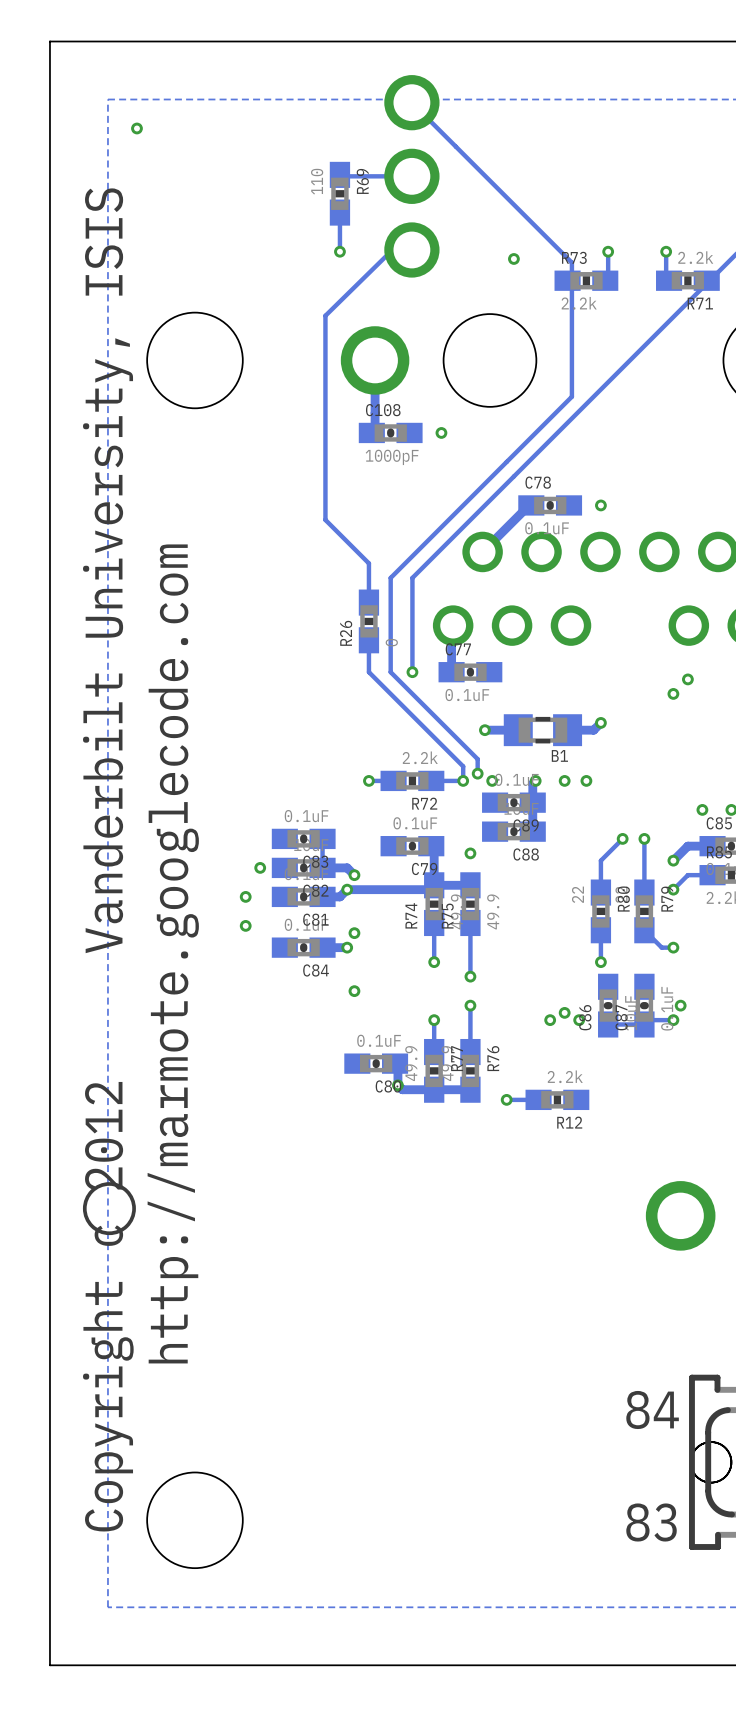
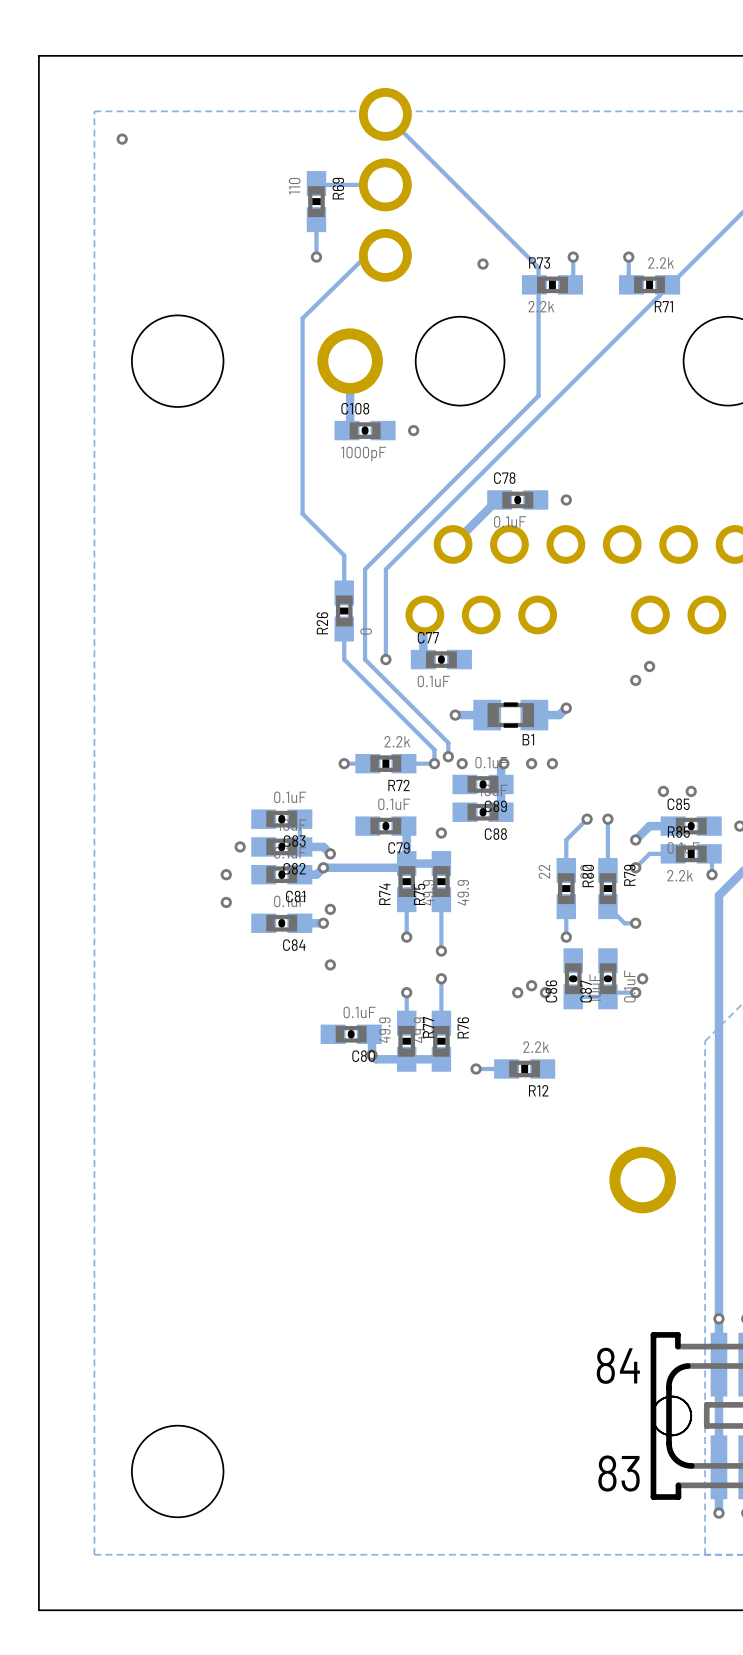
text: Vanderbilt University, ISIS (108, 570) -> none
text: http://marmote.googlecode.com (173, 953) -> none
drawing: [82, 1182, 136, 1236] -> none
text: Copyright c 2012 (108, 1306) -> none

